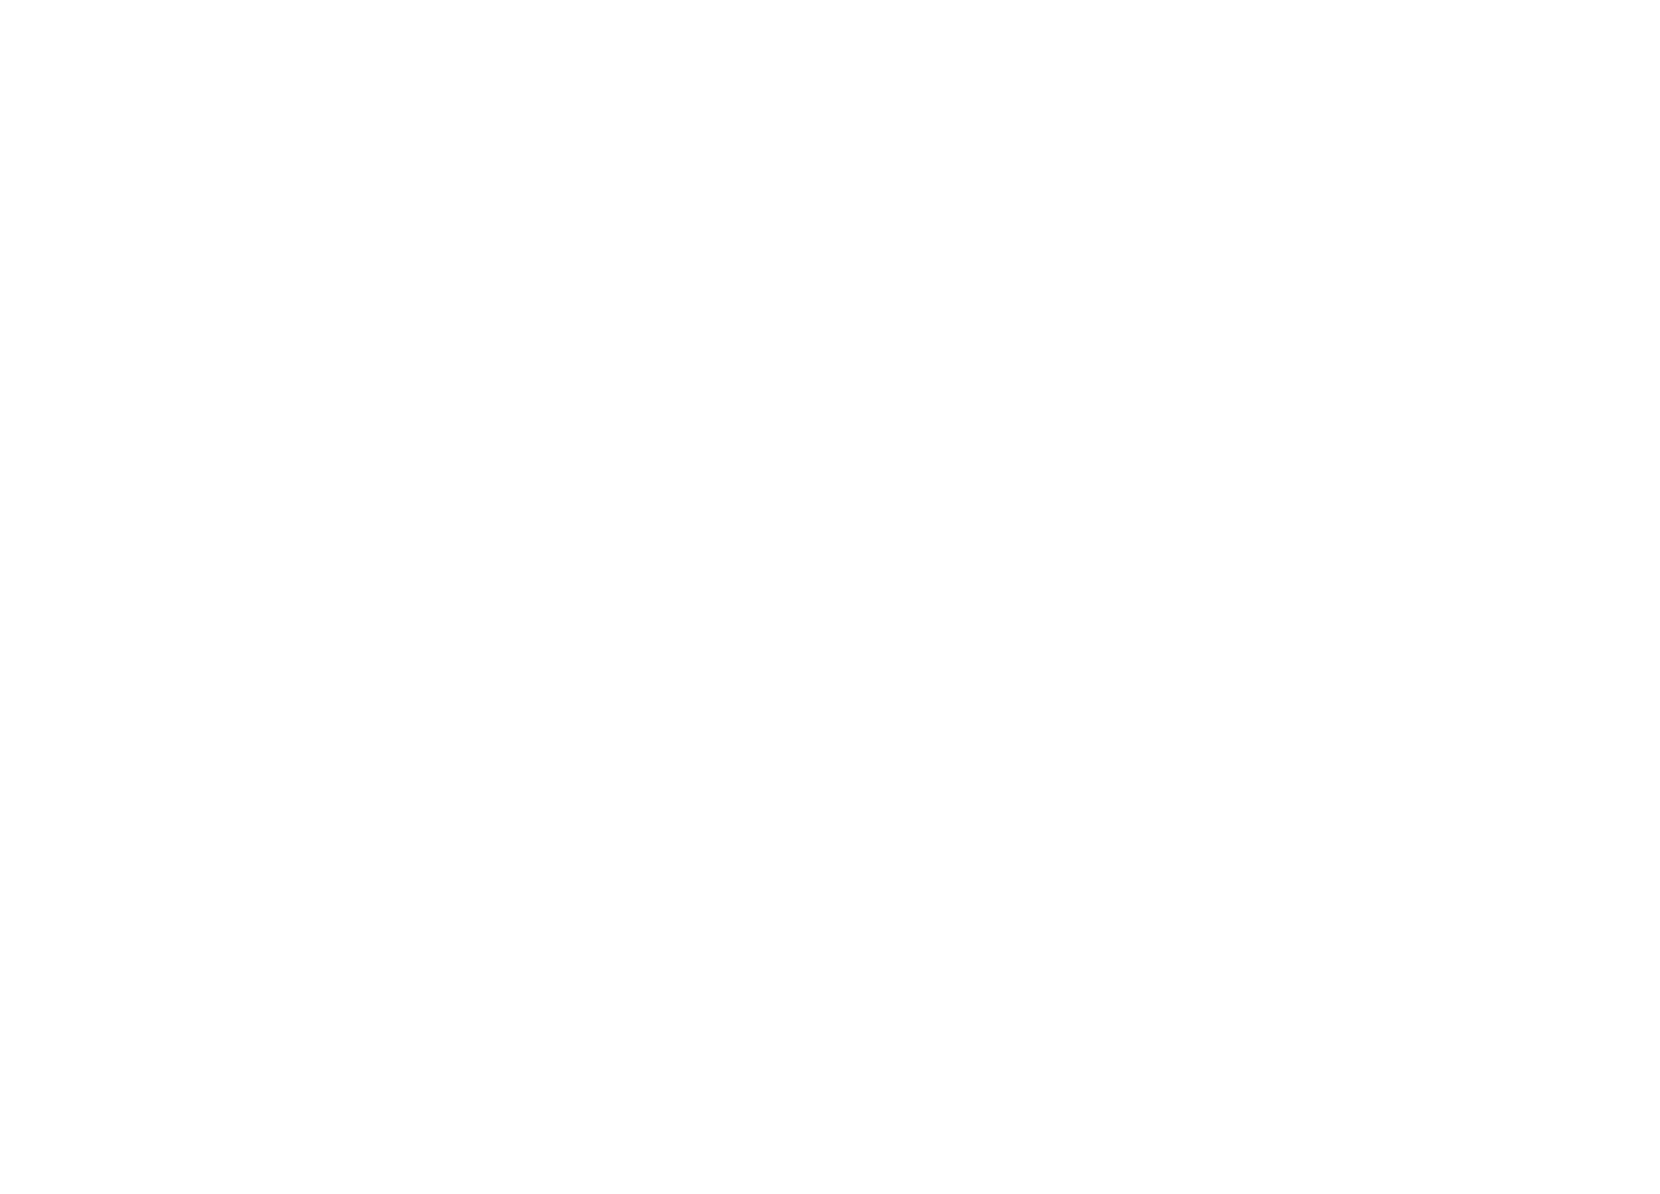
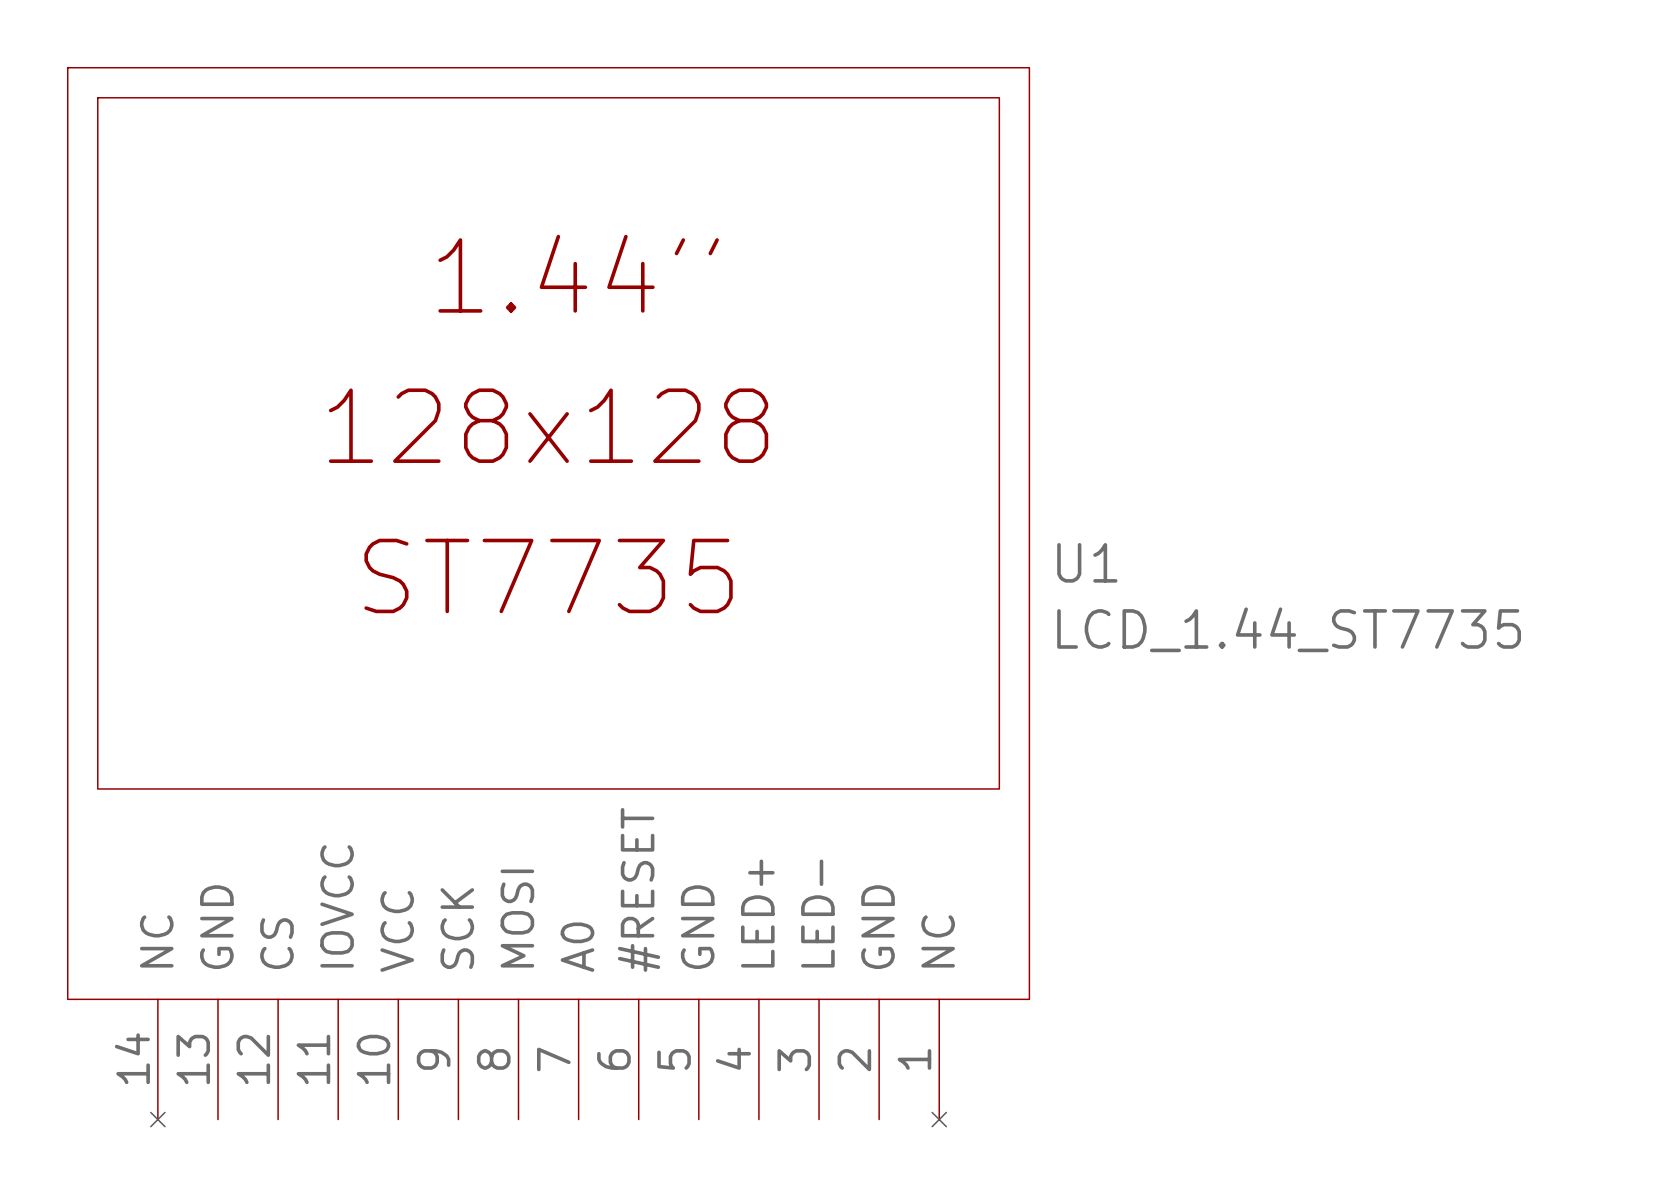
U1: none -> LCD_1.44_ST7735 (548, 597)

